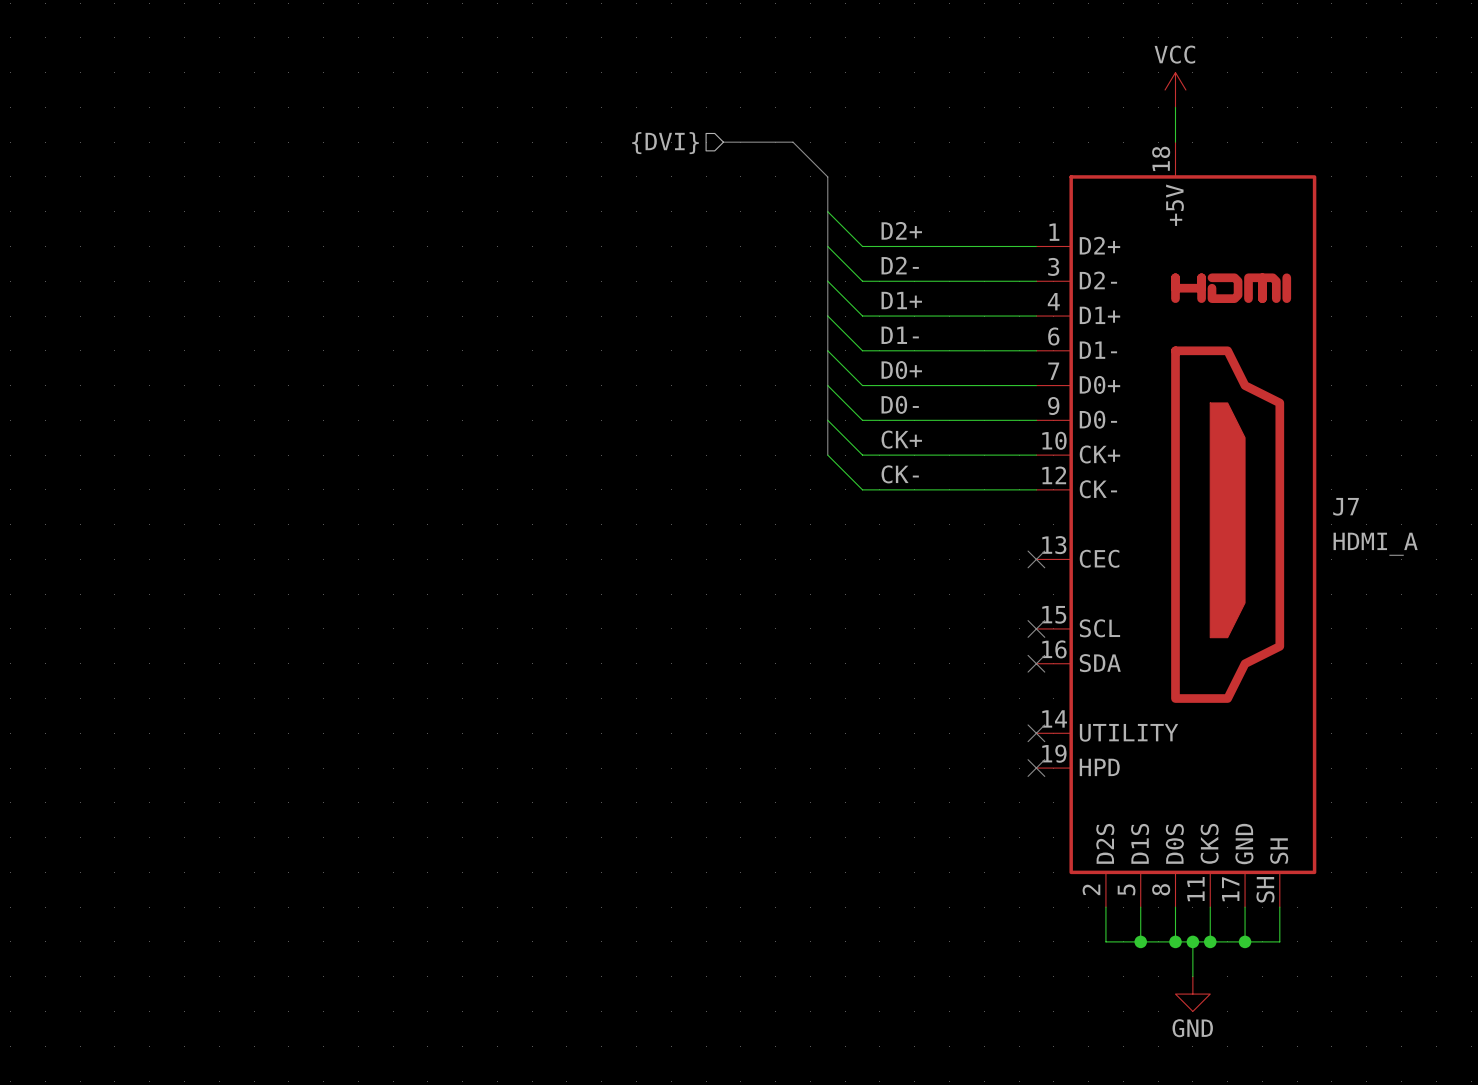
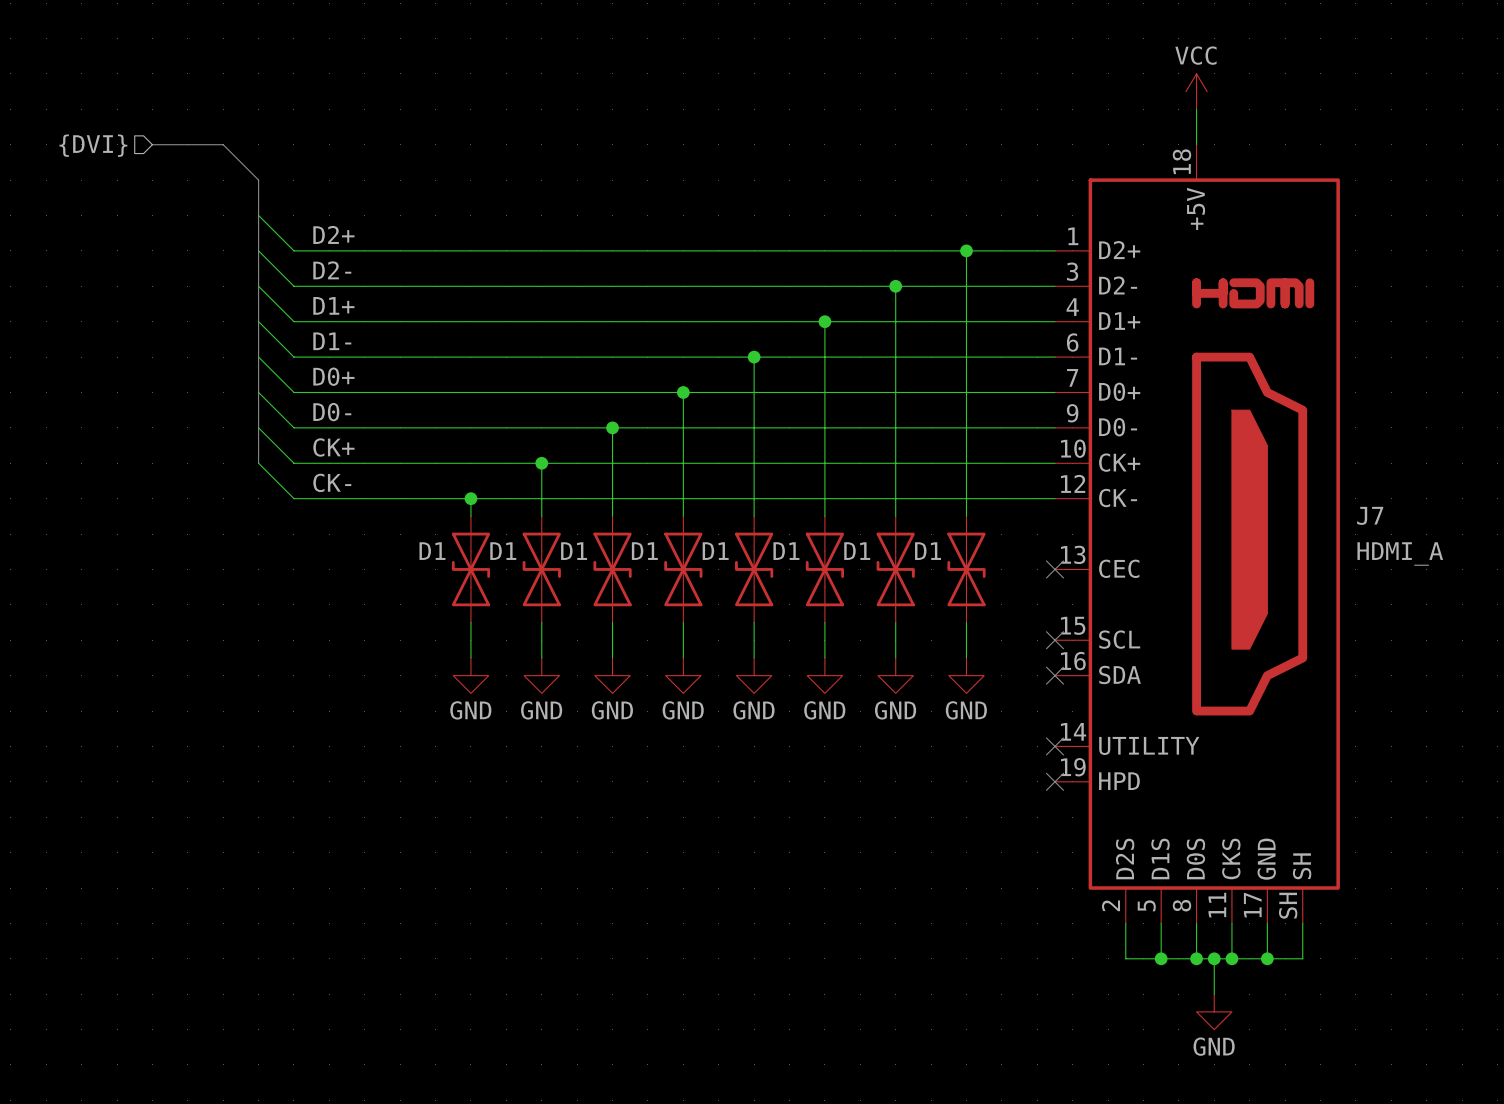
bus: none -> (152, 144) (223, 144) (258, 180) (258, 463)
bus: (723, 142) (793, 142) (827, 176) (827, 455) -> none
hierarchical label: none -> {DVI} (93, 145)
hierarchical label: {DVI} (665, 143) -> none
wire: (827, 211) (862, 246) -> (258, 215) (293, 250) (878, 250)
label: none -> D2+ (333, 234)
label: D2+ (901, 230) -> none
wire: (827, 246) (862, 281) -> (258, 250) (293, 286) (878, 286)
wire: none -> (966, 250) (966, 516)
junction: none -> (966, 250)
label: none -> D2- (332, 270)
label: D2- (900, 265) -> none
wire: (827, 281) (862, 316) -> (258, 286) (293, 321) (878, 321)
wire: none -> (895, 286) (895, 516)
junction: none -> (895, 286)
label: none -> D1+ (333, 305)
label: D1+ (901, 300) -> none
wire: none -> (824, 321) (824, 516)
junction: none -> (824, 321)
wire: (827, 316) (862, 350) -> (258, 321) (293, 357) (878, 357)
label: none -> D1- (332, 341)
label: D1- (900, 335) -> none
wire: none -> (754, 357) (754, 516)
junction: none -> (754, 357)
wire: (827, 350) (862, 385) -> (258, 357) (293, 392) (878, 392)
label: none -> D0+ (333, 376)
label: D0+ (901, 370) -> none
wire: none -> (683, 392) (683, 516)
junction: none -> (683, 392)
wire: (827, 385) (862, 420) -> (258, 392) (293, 427) (878, 427)
label: none -> D0- (332, 412)
label: D0- (900, 404) -> none
wire: none -> (612, 427) (612, 516)
junction: none -> (612, 427)
wire: (827, 420) (862, 455) -> (258, 427) (293, 463) (878, 463)
label: none -> CK+ (333, 447)
label: CK+ (901, 439) -> none
wire: none -> (541, 463) (541, 516)
junction: none -> (541, 463)
wire: (827, 455) (862, 489) -> (258, 463) (293, 498) (878, 498)
label: none -> CK- (332, 482)
label: CK- (900, 474) -> none
wire: none -> (470, 498) (470, 516)
junction: none -> (470, 498)
D1: none -> (470, 569)
D1: none -> (541, 569)
D1: none -> (612, 569)
D1: none -> (683, 569)
D1: none -> (754, 569)
D1: none -> (824, 569)
D1: none -> (895, 569)
D1: none -> (966, 569)
wire: none -> (470, 622) (470, 657)
wire: none -> (541, 622) (541, 657)
wire: none -> (612, 622) (612, 657)
wire: none -> (683, 622) (683, 657)
wire: none -> (754, 622) (754, 657)
wire: none -> (824, 622) (824, 657)
wire: none -> (895, 622) (895, 657)
wire: none -> (966, 622) (966, 657)
power symbol: none -> GND (470, 675)
power symbol: none -> GND (541, 675)
power symbol: none -> GND (612, 675)
power symbol: none -> GND (683, 675)
power symbol: none -> GND (754, 675)
power symbol: none -> GND (824, 675)
power symbol: none -> GND (895, 675)
power symbol: none -> GND (966, 675)

